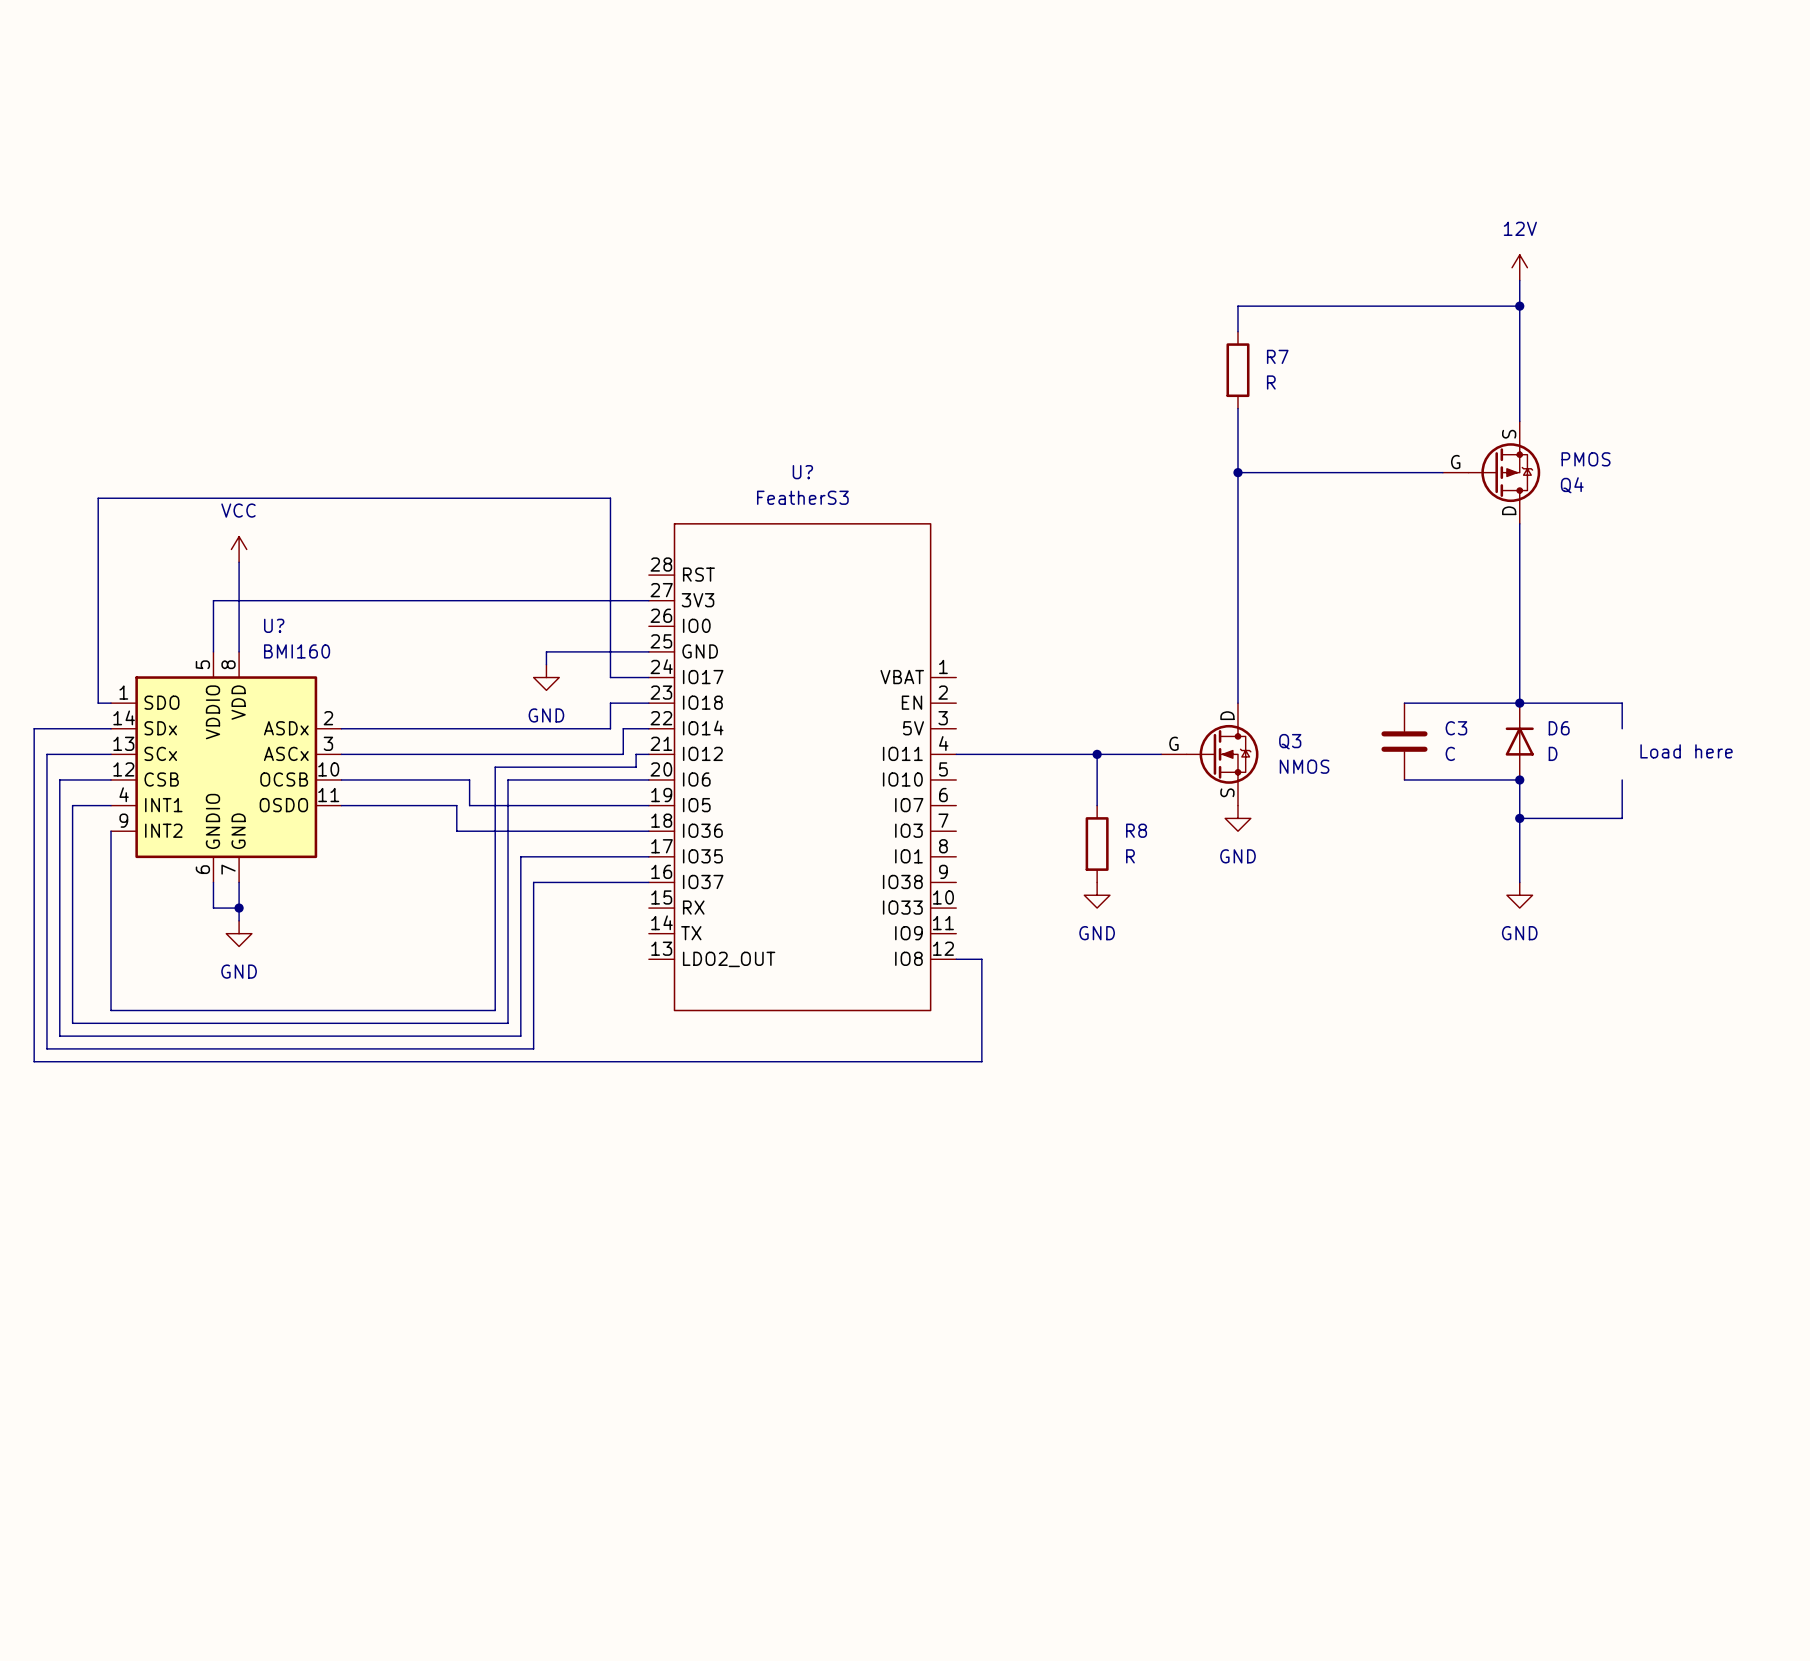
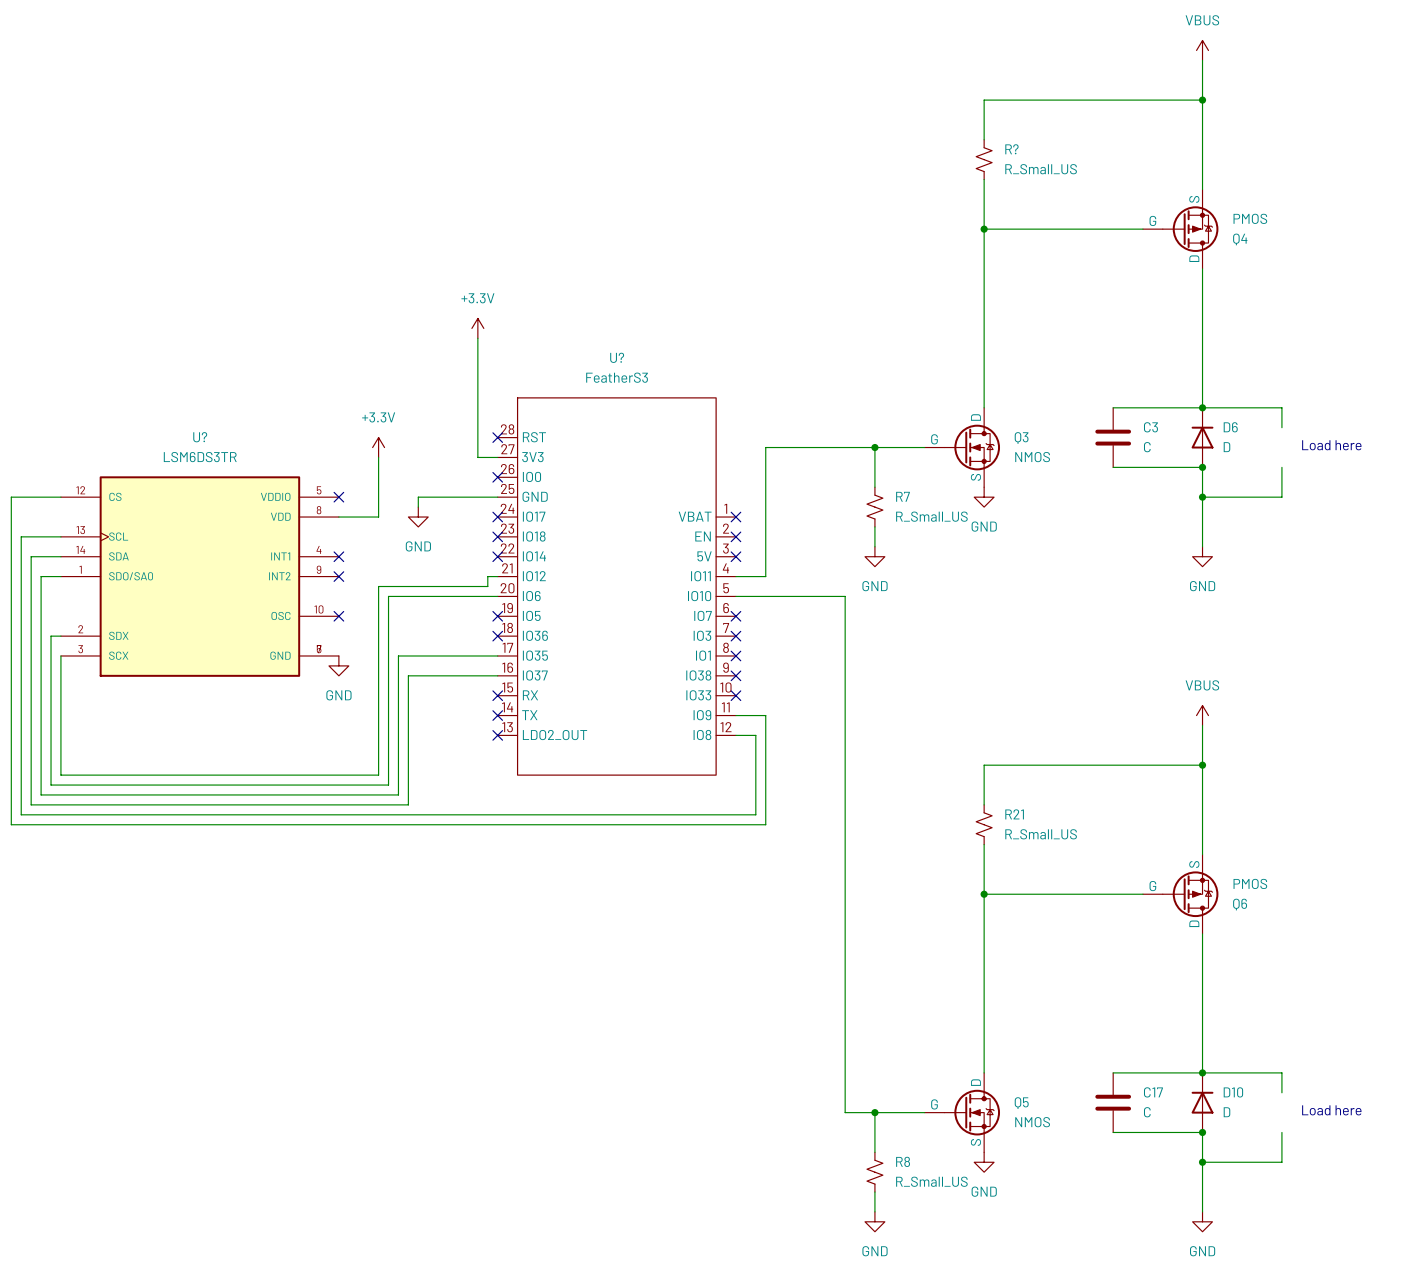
power symbol: none -> VBUS (1202, 50)
wire: none -> (1202, 60) (1202, 189)
wire: none -> (1202, 100) (984, 100) (984, 139)
junction: none -> (1202, 100)
R?: none -> R_Small_US (984, 159)
power symbol: 12V (1519, 267) -> none
wire: (1519, 280) (1519, 421) -> none
wire: (1276, 306) (1237, 306) (1237, 331) -> none
junction: none -> (984, 229)
junction: (1519, 306) -> none
R7 symbol: [1226, 331, 1250, 409] -> [867, 487, 883, 527]
R7 value: R (1271, 382) -> R_Small_US (931, 516)
wire: (1237, 408) (1237, 703) -> (984, 179) (984, 407)
power symbol: none -> +3.3V (477, 328)
wire: (1237, 472) (1442, 472) -> none
junction: (1237, 472) -> none
Q4 position: (1491, 472) -> (1180, 229)
wire: (1519, 523) (1519, 703) -> (1202, 268) (1202, 407)
junction: none -> (1202, 407)
power symbol: VCC (239, 549) -> none
wire: (239, 562) (239, 651) -> none
no-connect mark: none -> (497, 437)
power symbol: none -> +3.3V (378, 447)
wire: none -> (874, 447) (874, 487)
junction: none -> (874, 447)
wire: none -> (378, 457) (378, 517) (338, 517)
wire: (623, 600) (213, 600) (213, 651) -> (477, 457) (477, 338)
junction: none -> (1202, 467)
no-connect mark: none -> (497, 477)
wire: none -> (60, 497) (11, 497) (11, 824) (765, 824) (765, 715) (735, 715)
no-connect mark: none -> (338, 497)
power symbol: none -> GND (984, 497)
junction: none -> (1202, 497)
wire: (648, 677) (610, 677) (610, 498) (98, 498) (98, 703) (111, 703) -> none
no-connect mark: none -> (497, 517)
no-connect mark: none -> (735, 517)
wire: none -> (874, 526) (874, 546)
wire: none -> (60, 536) (21, 536) (21, 556)
wire: (648, 703) (610, 703) (610, 728) (341, 728) -> none
no-connect mark: none -> (497, 536)
no-connect mark: none -> (735, 536)
wire: (1404, 703) (1622, 703) (1622, 728) -> (1113, 407) (1281, 407) (1281, 427)
junction: (1519, 703) -> none
wire: (34, 728) (46, 728) -> (31, 576) (31, 556)
no-connect mark: none -> (338, 556)
wire: (648, 728) (623, 728) (623, 754) (341, 754) -> none
no-connect mark: none -> (497, 556)
no-connect mark: none -> (735, 556)
power symbol: none -> GND (874, 556)
power symbol: none -> GND (1202, 556)
C3 position: (1404, 741) -> (1113, 437)
D6 position: (1519, 741) -> (1202, 437)
text position: Load here (1686, 751) -> Load here (1331, 445)
wire: (46, 754) (59, 754) -> (41, 596) (41, 576)
U?: none -> LSM6DS3TR (199, 576)
no-connect mark: none -> (338, 576)
wire: (994, 754) (1161, 754) -> (765, 576) (765, 447) (924, 447)
wire: (1097, 754) (1097, 779) -> (735, 596) (845, 596)
junction: (1097, 754) -> none
Q3 position: (1209, 754) -> (962, 447)
U?: BMI160 (226, 767) -> none
wire: (59, 779) (111, 779) -> none
wire: (341, 779) (469, 779) (469, 805) (648, 805) -> none
wire: (1404, 779) (1519, 779) (1519, 882) -> (1113, 467) (1202, 467) (1202, 546)
junction: (1519, 779) -> none
wire: (1622, 779) (1622, 818) (1519, 818) -> (1281, 467) (1281, 497) (1202, 497)
wire: (111, 805) (72, 805) (72, 831) -> (60, 636) (51, 636)
wire: (341, 805) (456, 805) (456, 831) (648, 831) -> none
no-connect mark: none -> (338, 616)
no-connect mark: none -> (497, 616)
no-connect mark: none -> (735, 616)
R8 symbol: [1085, 805, 1109, 883] -> [867, 1152, 883, 1193]
wire: none -> (845, 616) (845, 1112) (924, 1112)
power symbol: GND (1237, 818) -> none
junction: (1519, 818) -> none
wire: (111, 831) (111, 1010) -> (60, 655) (60, 775) (80, 775)
no-connect mark: none -> (497, 636)
no-connect mark: none -> (735, 636)
no-connect mark: none -> (735, 655)
R8 value: R (1130, 856) -> R_Small_US (931, 1181)
wire: (213, 882) (213, 908) (239, 908) -> none
wire: (239, 882) (239, 920) -> none
no-connect mark: none -> (735, 675)
power symbol: GND (1097, 895) -> none
power symbol: GND (1519, 895) -> none
junction: (239, 908) -> none
no-connect mark: none -> (497, 695)
no-connect mark: none -> (735, 695)
power symbol position: GND (239, 933) -> GND (338, 665)
no-connect mark: none -> (497, 715)
power symbol: none -> VBUS (1202, 715)
wire: none -> (1202, 725) (1202, 854)
no-connect mark: none -> (497, 735)
wire: none -> (1202, 765) (984, 765) (984, 804)
junction: none -> (1202, 765)
R21: none -> R_Small_US (984, 824)
wire: none -> (984, 844) (984, 1072)
wire: none -> (984, 894) (1142, 894)
junction: none -> (984, 894)
Q6: none -> PMOS (1180, 894)
wire: none -> (1202, 933) (1202, 1072)
wire: none -> (1113, 1072) (1281, 1072) (1281, 1092)
junction: none -> (1202, 1072)
C17: none -> C (1113, 1102)
D10: none -> D (1202, 1102)
text: none -> Load here (1331, 1110)
wire: none -> (874, 1112) (874, 1152)
junction: none -> (874, 1112)
Q5: none -> NMOS (962, 1112)
wire: none -> (1113, 1132) (1202, 1132) (1202, 1211)
junction: none -> (1202, 1132)
wire: none -> (1281, 1132) (1281, 1162) (1202, 1162)
power symbol: none -> GND (984, 1162)
junction: none -> (1202, 1162)
wire: none -> (874, 1192) (874, 1211)
power symbol: none -> GND (874, 1221)
power symbol: none -> GND (1202, 1221)

